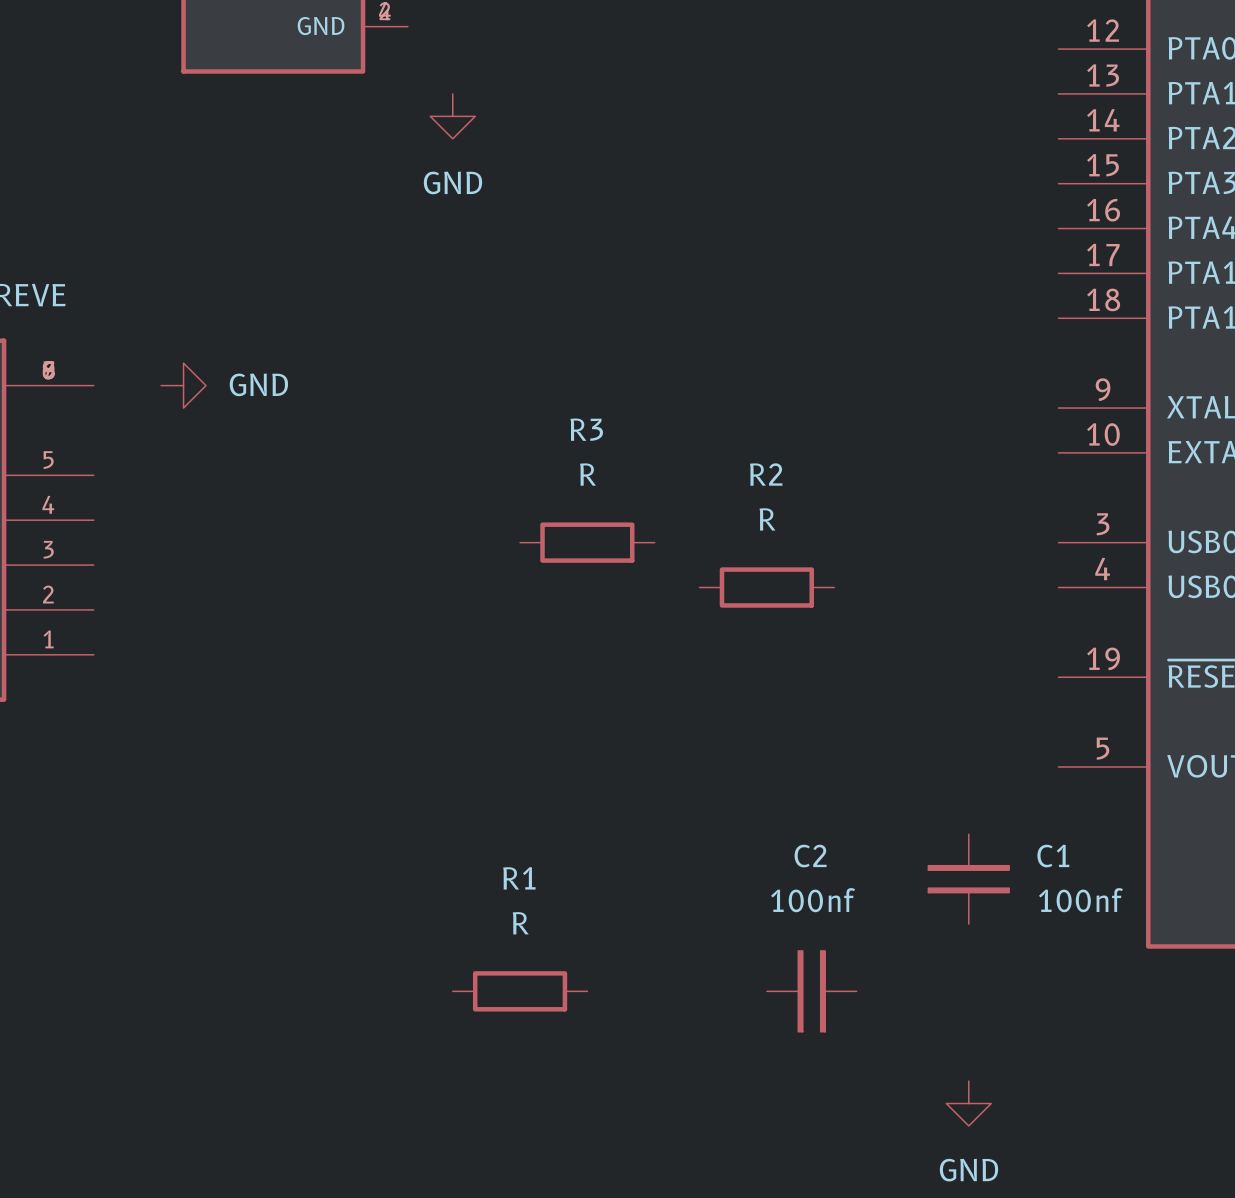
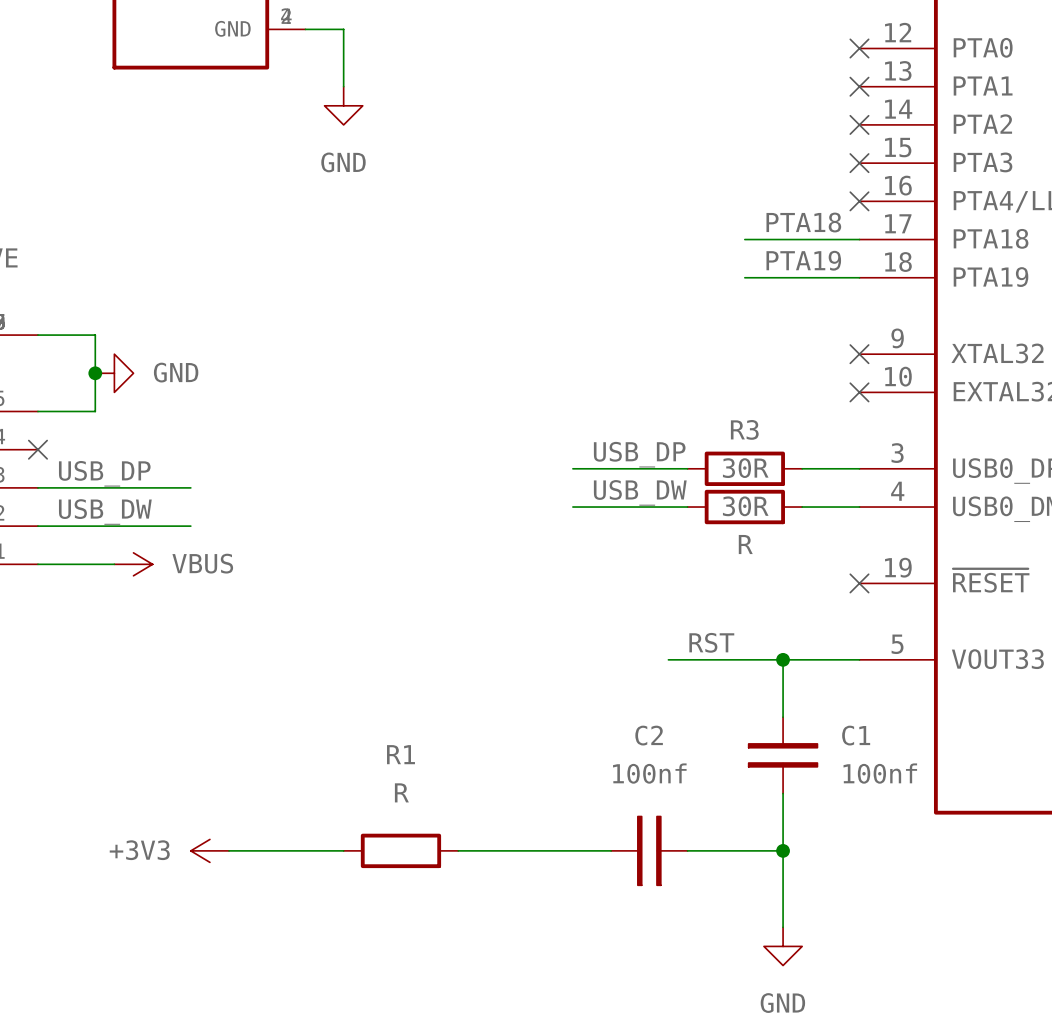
wire: none -> (305, 29) (343, 29) (343, 86)
no-connect mark: none -> (859, 48)
no-connect mark: none -> (859, 86)
no-connect mark: none -> (859, 124)
no-connect mark: none -> (859, 163)
no-connect mark: none -> (859, 201)
label: none -> PTA18 (803, 222)
wire: none -> (744, 239) (859, 239)
label: none -> PTA19 (803, 260)
wire: none -> (744, 277) (859, 277)
wire: none -> (37, 335) (95, 335) (95, 411) (37, 411)
power symbol position: GND (183, 385) -> GND (114, 373)
no-connect mark: none -> (859, 354)
R3 name position: R3 (586, 429) -> R3 (744, 429)
junction: none -> (95, 373)
no-connect mark: none -> (859, 392)
R3 value: R (588, 474) -> 30R (745, 468)
no-connect mark: none -> (37, 449)
label: none -> USB_DP (639, 454)
R3 position: (587, 542) -> (744, 468)
wire: none -> (572, 468) (687, 468)
wire: none -> (802, 468) (859, 468)
label: none -> USB_DP (104, 473)
wire: none -> (37, 487) (190, 487)
label: none -> USB_DW (640, 492)
wire: none -> (572, 507) (687, 507)
R2: R (766, 587) -> none
30R: none -> R (744, 507)
wire: none -> (802, 507) (859, 507)
label: none -> USB_DW (105, 511)
wire: none -> (37, 526) (190, 526)
wire: none -> (37, 564) (114, 564)
power symbol: none -> VBUS (133, 564)
no-connect mark: none -> (859, 583)
label: none -> RST (711, 642)
wire: none -> (668, 659) (859, 659)
wire: none -> (783, 659) (783, 717)
junction: none -> (783, 659)
wire: none -> (783, 793) (783, 927)
power symbol: none -> +3V3 (209, 850)
wire: none -> (229, 850) (343, 850)
wire: none -> (458, 850) (611, 850)
wire: none -> (687, 850) (783, 850)
junction: none -> (783, 850)

